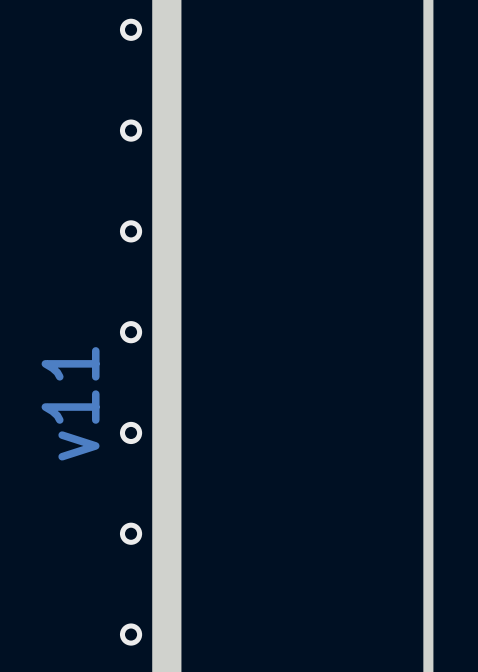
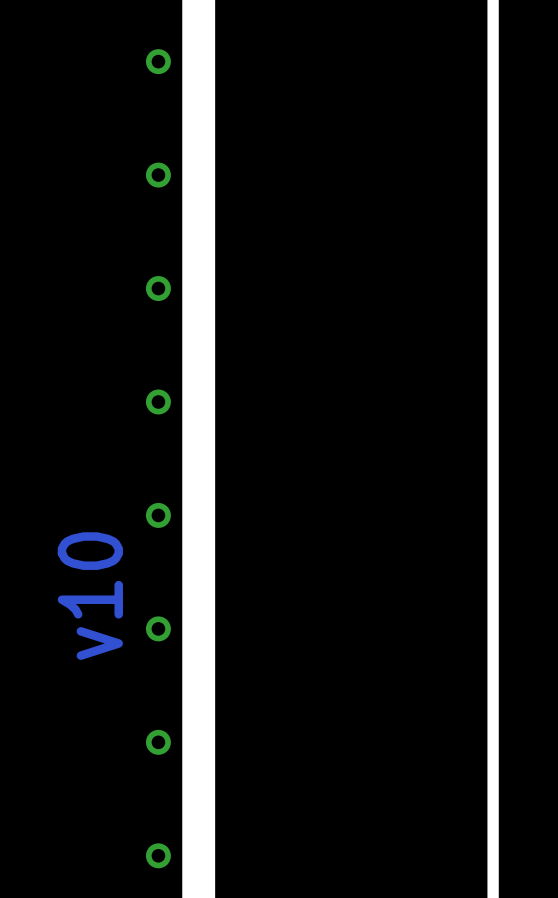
text: v11 (70, 403) -> v10 (90, 596)

